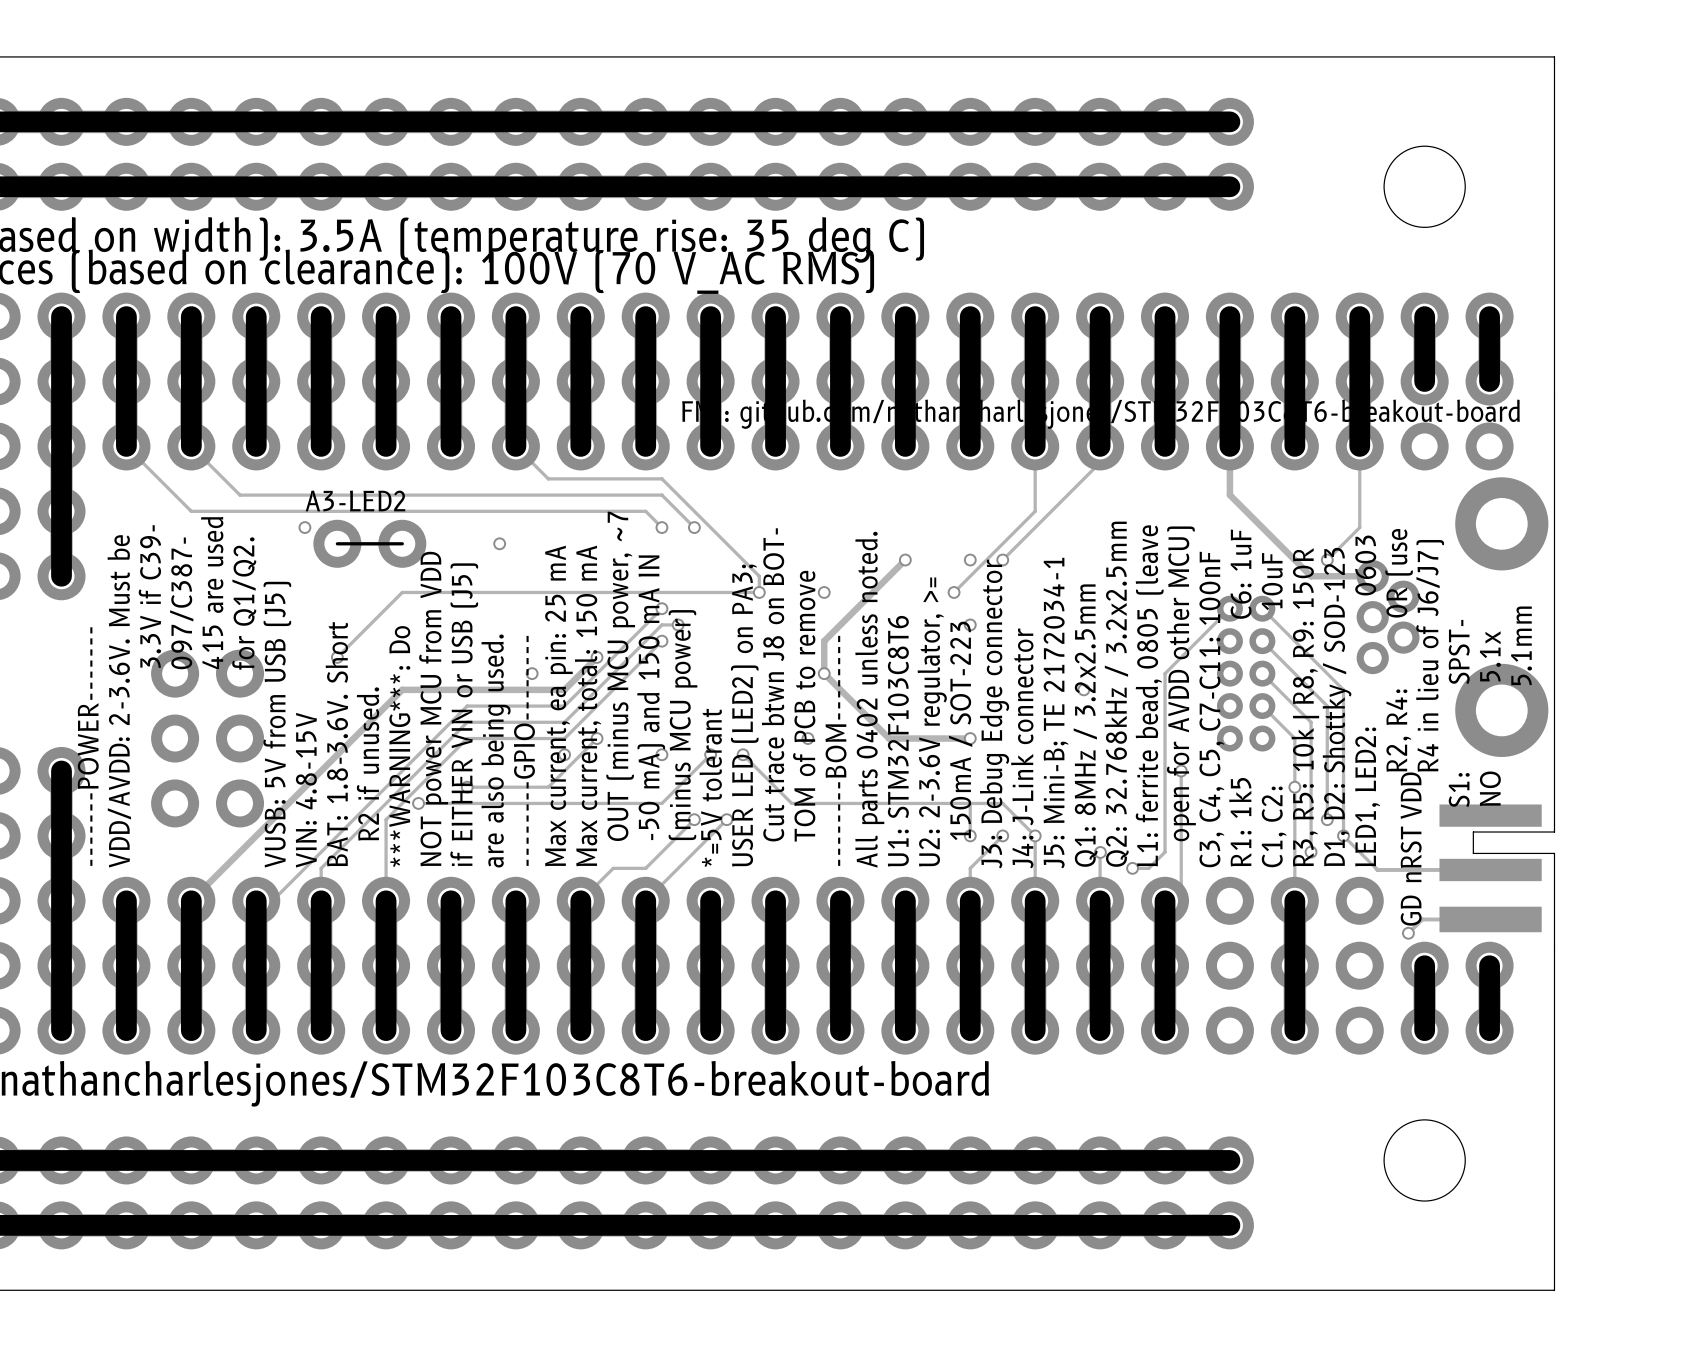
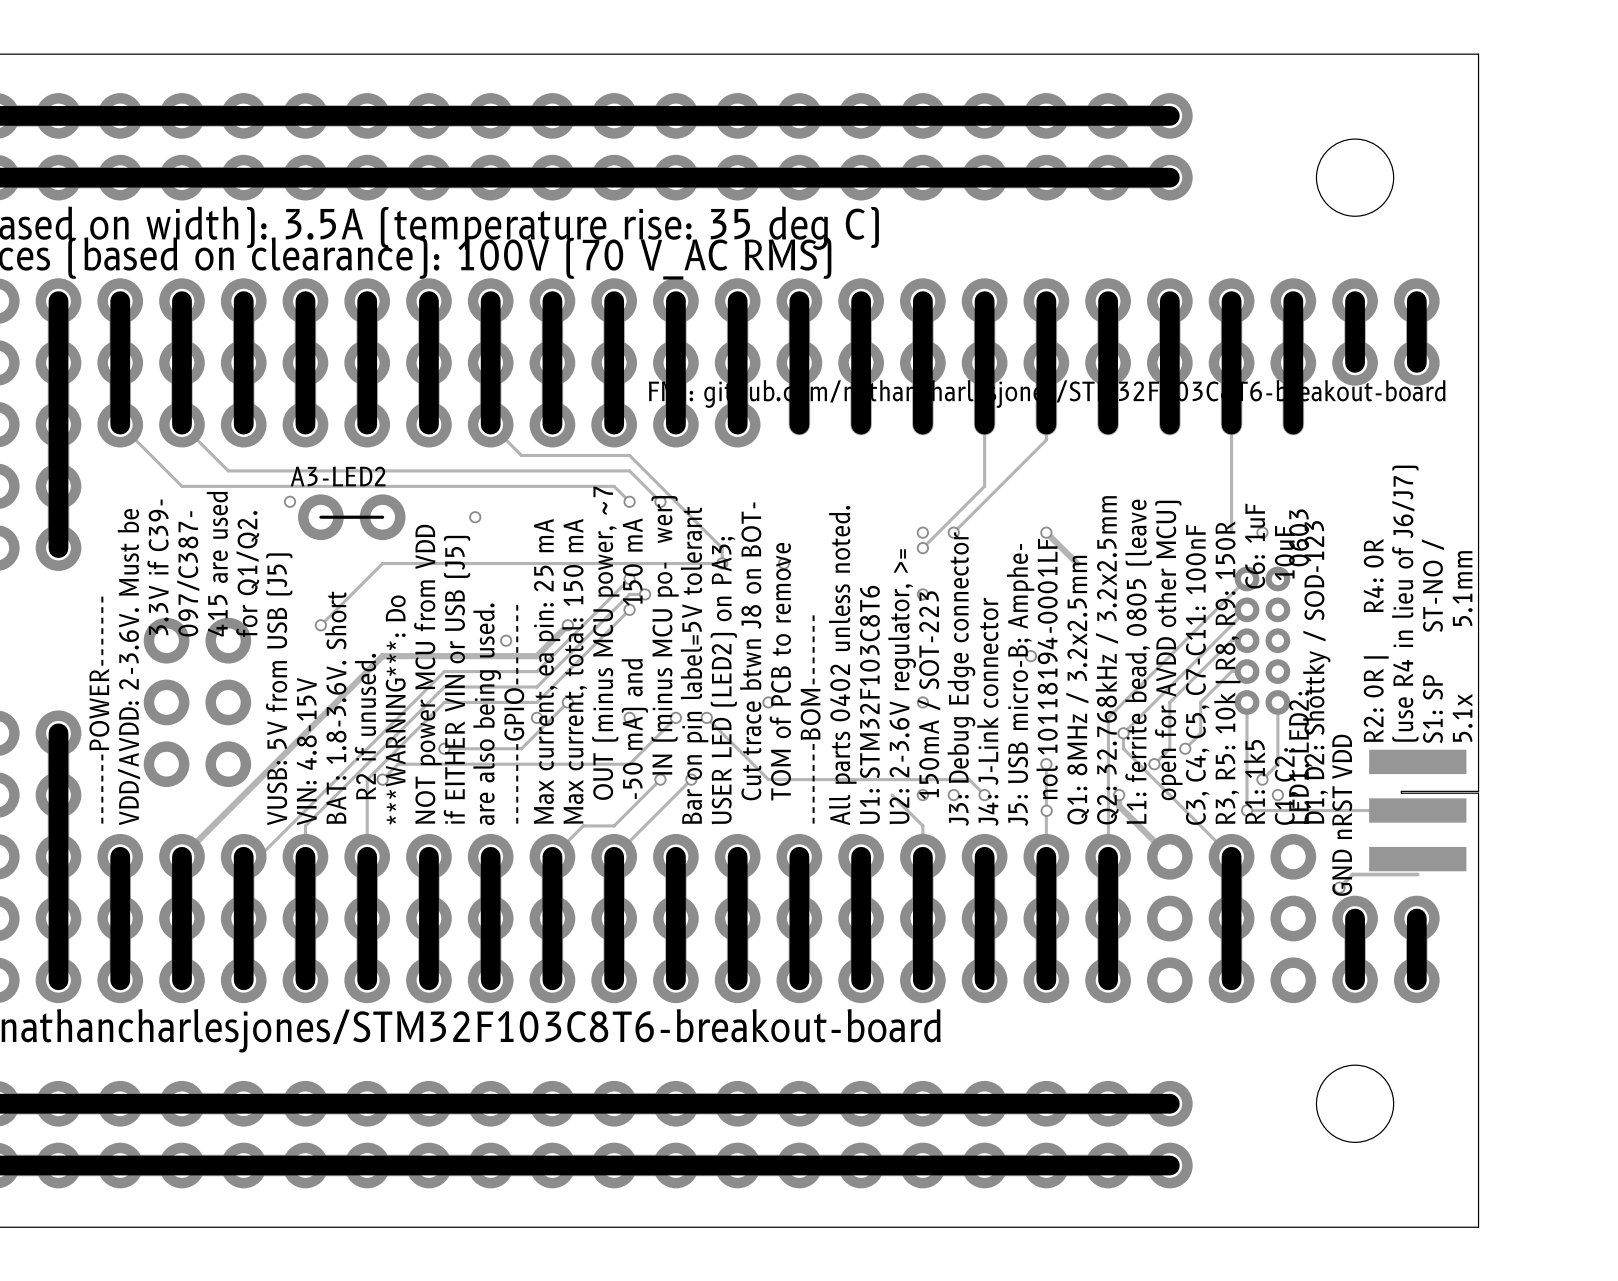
part: (1165, 446) -> none
track: (1229, 446) (1229, 495) (1311, 576) (1372, 576) -> none
track: none -> (1231, 424) (1231, 532)
track: (1359, 446) (1359, 527) (1327, 560) -> none
track: (905, 560) (824, 641) (824, 673) (889, 738) (970, 738) -> none
via: (905, 560) -> none
track: none -> (1046, 532) (1077, 563)
via: none -> (1046, 532)
track: (970, 576) (954, 592) -> (398, 764) (382, 779)
via position: (954, 592) -> (922, 548)
text position: 415 are used (212, 593) -> 415 are used (217, 564)
text position: 3.3V if C39- (149, 596) -> 3.3V if C39- (158, 567)
text position: 097/C387- (181, 603) -> 097/C387- (188, 573)
text position: for Q1/Q2. (244, 603) -> for Q1/Q2. (247, 574)
track: (1229, 608) (1165, 673) (1165, 852) (1148, 868) (1132, 868) -> none
track: (1262, 608) (1343, 689) (1343, 738) -> none
part: (1452, 617) -> none
text: none -> (use R4 in lieu of J6/J7) (1405, 603)
track: (1262, 641) (1327, 706) (1327, 819) -> none
track: none -> (1247, 609) (1123, 733)
text: 5.1mm (1521, 645) -> none
text: R2, R4: 0R (use (1399, 650) -> none
text: R4 in lieu of J6/J7) (1430, 655) -> none
via: (824, 673) -> none
part position: (1246, 673) -> (1262, 640)
track: (1262, 673) (1311, 722) (1311, 738) -> none
track: none -> (1247, 640) (1231, 640) (1169, 702) (1169, 748) (1154, 764)
text: none -> R2: 0R | R4: 0R (1376, 640)
text: none -> S1: SP ST-NO / (1432, 641)
text position: OUT (minus MCU power, ~7 (620, 676) -> OUT (minus MCU power, ~7 (605, 643)
text: none -> 5.1x 5.1mm (1462, 646)
text position: open for AVDD other MCU) (1181, 683) -> open for AVDD other MCU) (1168, 650)
text position: Cut trace btwn J8 on BOT- (773, 684) -> Cut trace btwn J8 on BOT- (750, 651)
text position: Q2: 32.768kHz / 3.2x2.5mm (1116, 694) -> Q2: 32.768kHz / 3.2x2.5mm (1107, 660)
text position: L1: ferrite bead, 0805 (leave (1149, 695) -> L1: ferrite bead, 0805 (leave (1138, 661)
text: -50 mA) and 150 mA IN (651, 697) -> -50 mA) and 150 mA (634, 658)
text position: R1: 1k5 C6: 1uF (1240, 698) -> R1: 1k5 C6: 1uF (1254, 663)
text: none -> Bar on pin label=5V tolerant (694, 665)
text position: All parts 0402 unless noted. (869, 699) -> All parts 0402 unless noted. (842, 665)
text position: VDD/AVDD: 2-3.6V. Must be (119, 701) -> VDD/AVDD: 2-3.6V. Must be (128, 667)
text: none -> nol 10118194-0001LF (1047, 668)
text position: Max current, ea pin: 25 mA (558, 705) -> Max current, ea pin: 25 mA (547, 671)
text position: Max current, total: 150 mA (588, 705) -> Max current, total: 150 mA (574, 671)
text position: TOM of PCB to remove (804, 706) -> TOM of PCB to remove (780, 671)
track: (1262, 706) (1294, 738) (1294, 900) -> (1123, 748) (1231, 856)
track: none -> (1247, 671) (1231, 671) (1200, 702) (1200, 733) (1185, 748)
text position: R3, R5: 10k | R8, R9: 150R (1305, 707) -> R3, R5: 10k | R8, R9: 150R (1227, 672)
text position: D1, D2: Shottky / SOD-123 (1337, 707) -> D1, D2: Shottky / SOD-123 (1316, 672)
text position: NOT power MCU from VDD (433, 709) -> NOT power MCU from VDD (427, 674)
text position: C3, C4, C5, C7-C11: 100nF (1211, 709) -> C3, C4, C5, C7-C11: 100nF (1197, 674)
text position: C1, C2: 10uF (1274, 710) -> C1, C2: 10uF (1286, 675)
text: J5: Mini-B; TE 2172034-1 (1056, 713) -> J5: USB micro-B; Amphe- (1020, 684)
text: S1: SPST- (1459, 713) -> none
text position: if EITHER VIN or USB (J5) (464, 714) -> if EITHER VIN or USB (J5) (456, 679)
text position: J3: Debug Edge connector (994, 714) -> J3: Debug Edge connector (961, 679)
text position: USER LED (LED2) on PA3; (744, 715) -> USER LED (LED2) on PA3; (723, 680)
text: NO 5.1x (1490, 718) -> none
text position: U2: 2-3.6V regulator, >= (932, 722) -> U2: 2-3.6V regulator, >= (902, 686)
text position: VUSB: 5V from USB (J5) (277, 724) -> VUSB: 5V from USB (J5) (279, 689)
text: (minus MCU power) (682, 725) -> IN (minus MCU po- wer) (665, 635)
text position: Q1: 8MHz / 3.2x2.5mm (1085, 725) -> Q1: 8MHz / 3.2x2.5mm (1077, 690)
text position: 150mA / SOT-223 (960, 730) -> 150mA / SOT-223 (929, 695)
text position: U1: STM32F103C8T6 (898, 741) -> U1: STM32F103C8T6 (869, 704)
text position: BAT: 1.8-3.6V. Short (336, 744) -> BAT: 1.8-3.6V. Short (335, 707)
text position: -------POWER------- (88, 746) -> -------POWER------- (99, 710)
text position: ***WARNING***: Do (399, 746) -> ***WARNING***: Do (395, 709)
text position: J4: J-Link connector (1022, 748) -> J4: J-Link connector (987, 711)
text position: are also being used. (496, 750) -> are also being used. (487, 714)
text position: --------GPIO-------- (524, 750) -> --------GPIO-------- (514, 714)
text: --------BOM-------- (836, 750) -> --------BOM------- (810, 719)
text position: R2 if unused. (367, 764) -> R2 if unused. (365, 726)
text: *=5V tolerant (710, 787) -> none
track: (1181, 787) (1181, 884) (1165, 900) -> (1247, 578) (1108, 717) (1108, 856)
via: none -> (1185, 748)
via: (1294, 787) -> none
text position: VIN: 4.8-15V (306, 790) -> VIN: 4.8-15V (306, 751)
via position: (418, 803) -> (382, 779)
track: (791, 803) (1002, 803) (1018, 819) -> (753, 764) (768, 779) (969, 779)
track: (970, 803) (970, 835) -> none
track: none -> (1046, 764) (1046, 811)
via: none -> (1046, 764)
via: none -> (1154, 764)
track: (1343, 803) (1343, 835) (1377, 869) (1490, 869) -> (1277, 764) (1262, 779)
part footprint: [1439, 804, 1542, 933] -> [1369, 749, 1467, 872]
board edge: (1473, 833) (1473, 853) (1554, 853) -> (1401, 793) (1478, 793) (1478, 811)
track: (1002, 835) (970, 868) -> (892, 795) (922, 825)
track: (1035, 835) (1035, 900) -> none
track: none -> (1119, 795) (1119, 806) (1169, 856)
via: none -> (1119, 795)
track: none -> (1417, 810) (1247, 810)
via: (1132, 868) -> none
text: GD (1411, 910) -> GND (1342, 872)

